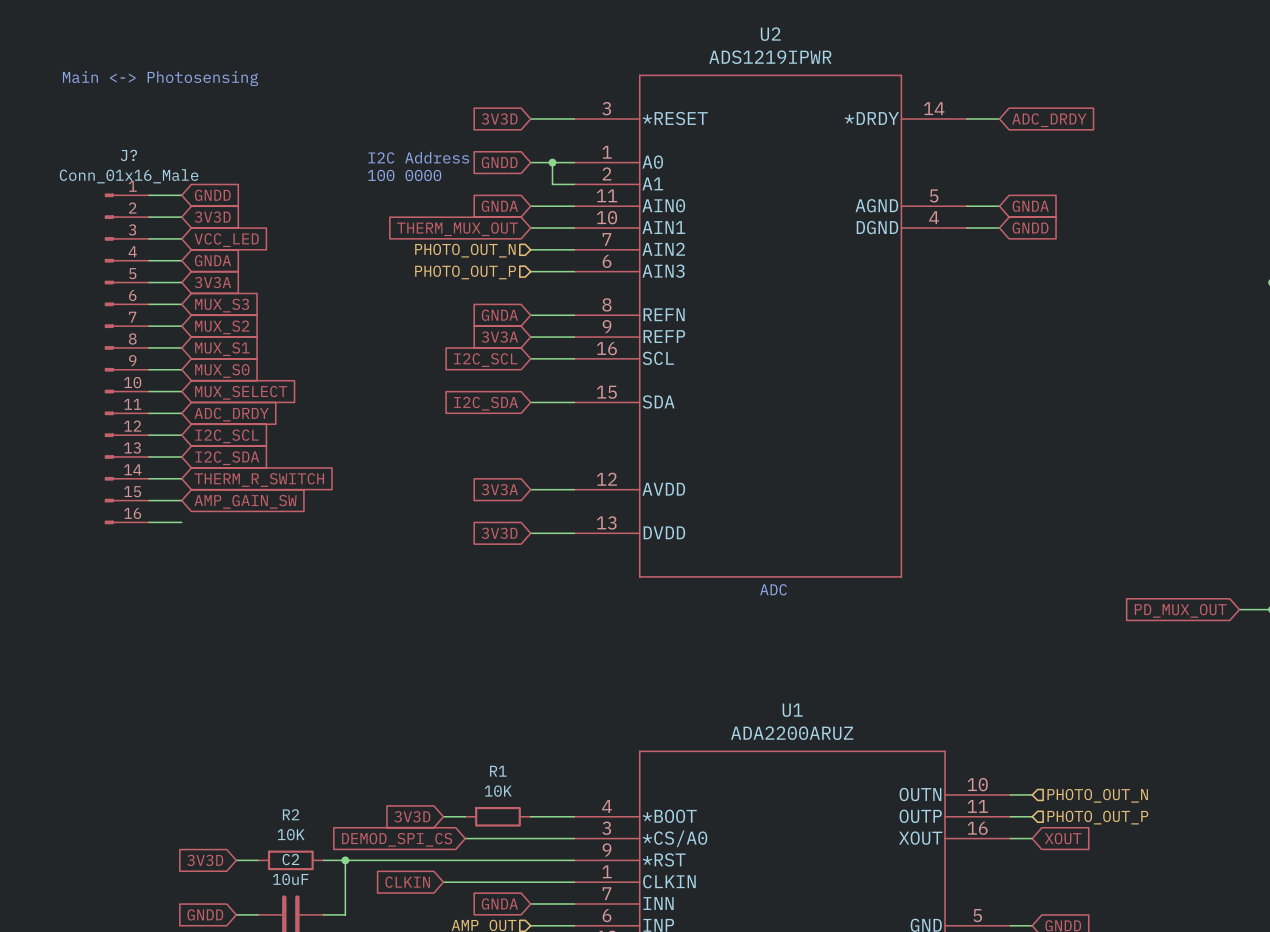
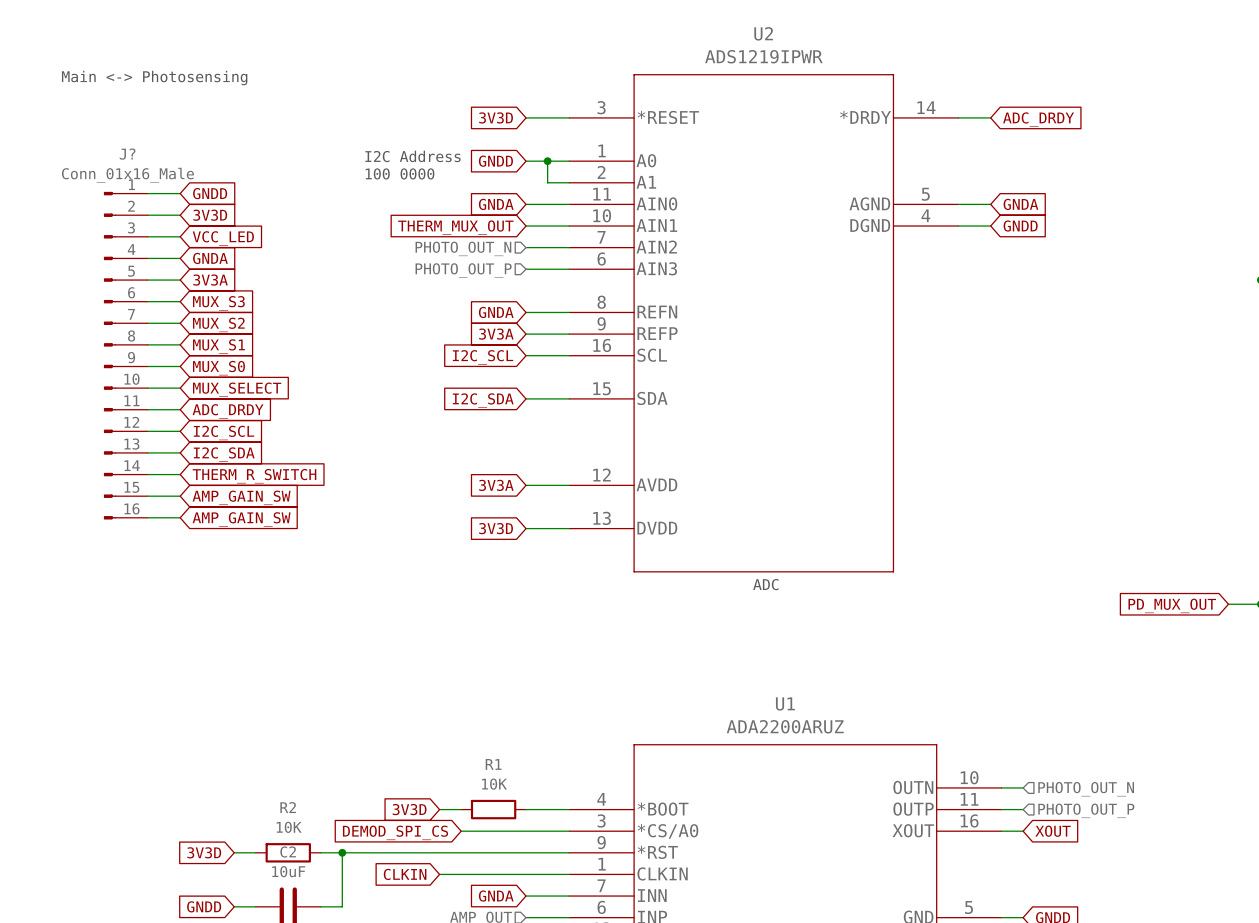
global label: none -> AMP_GAIN_SW (241, 519)

